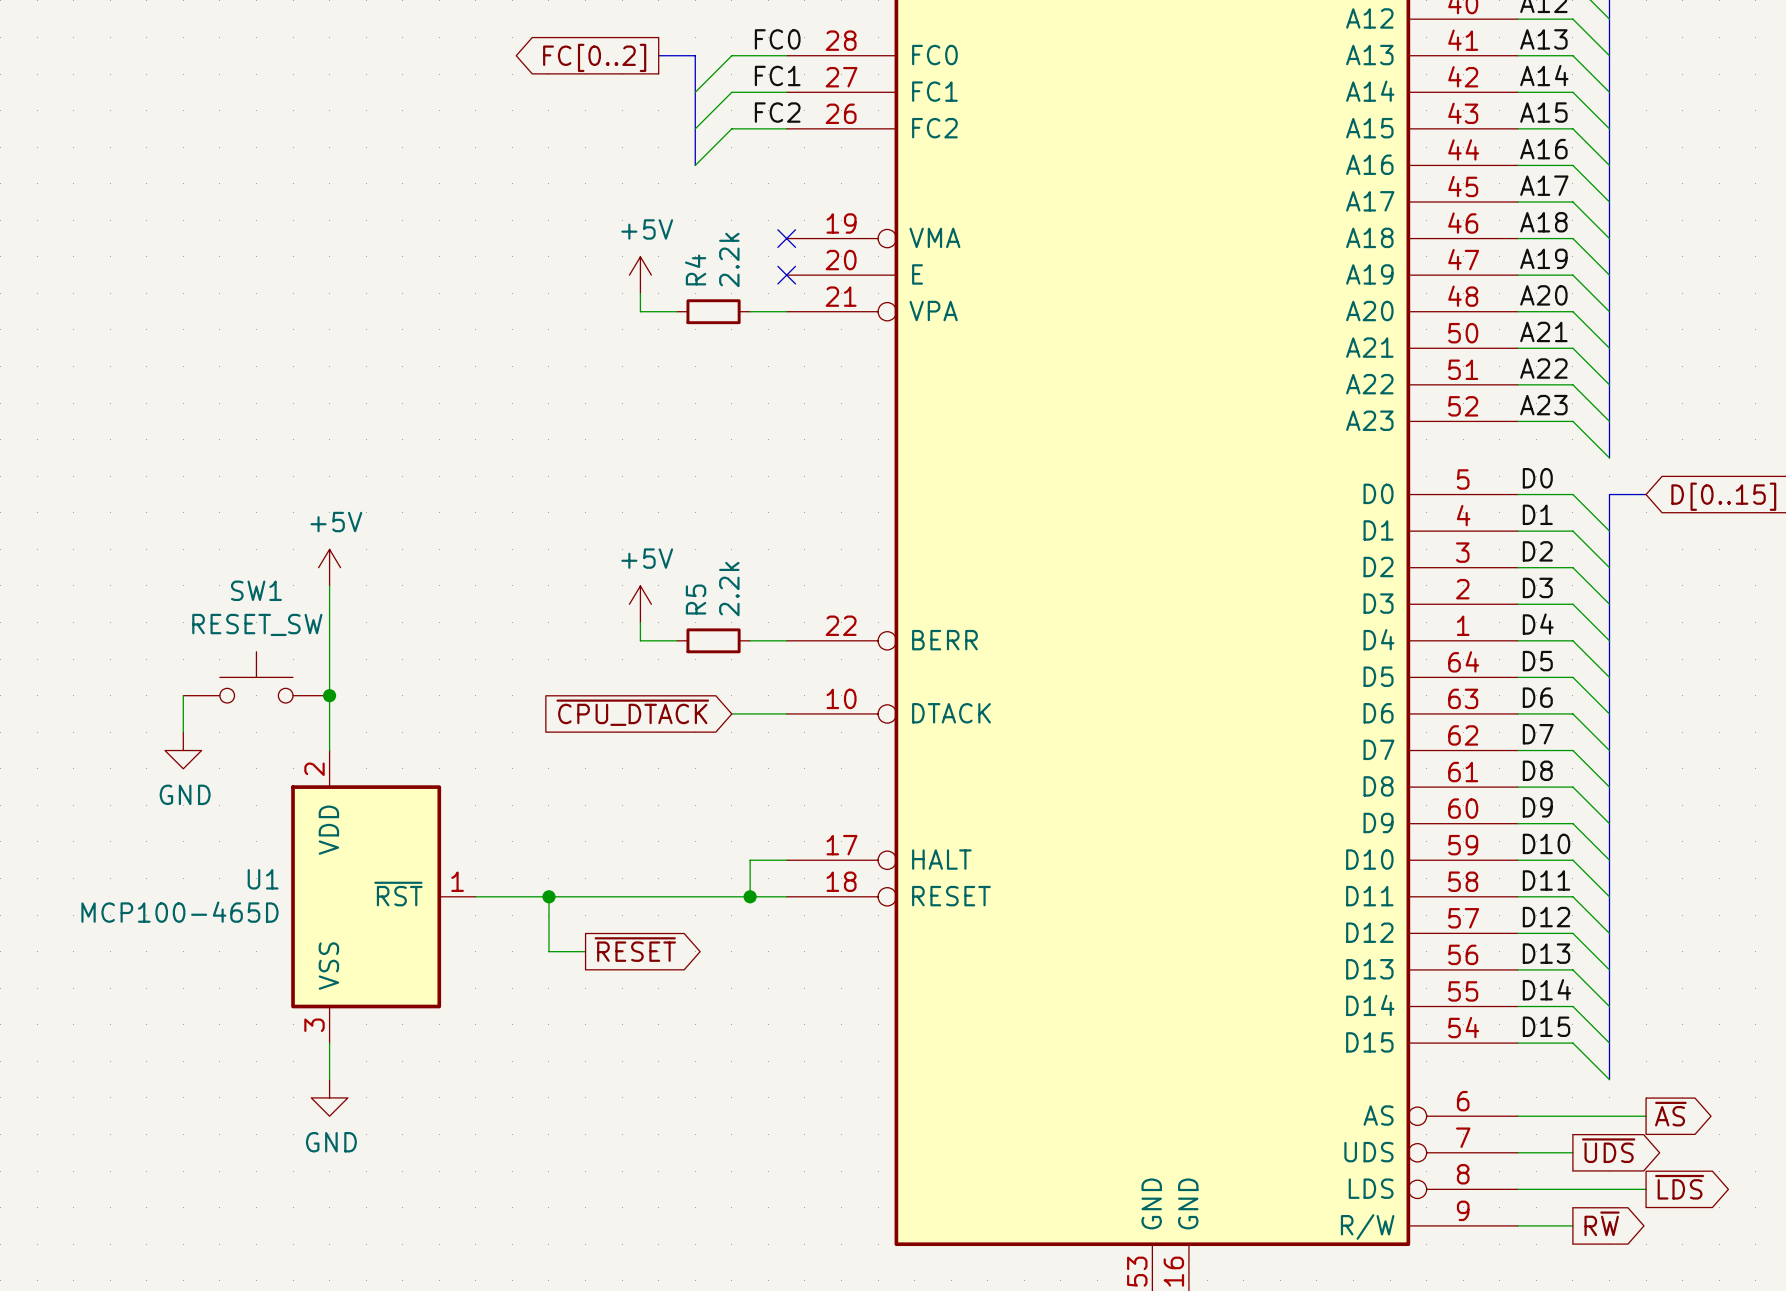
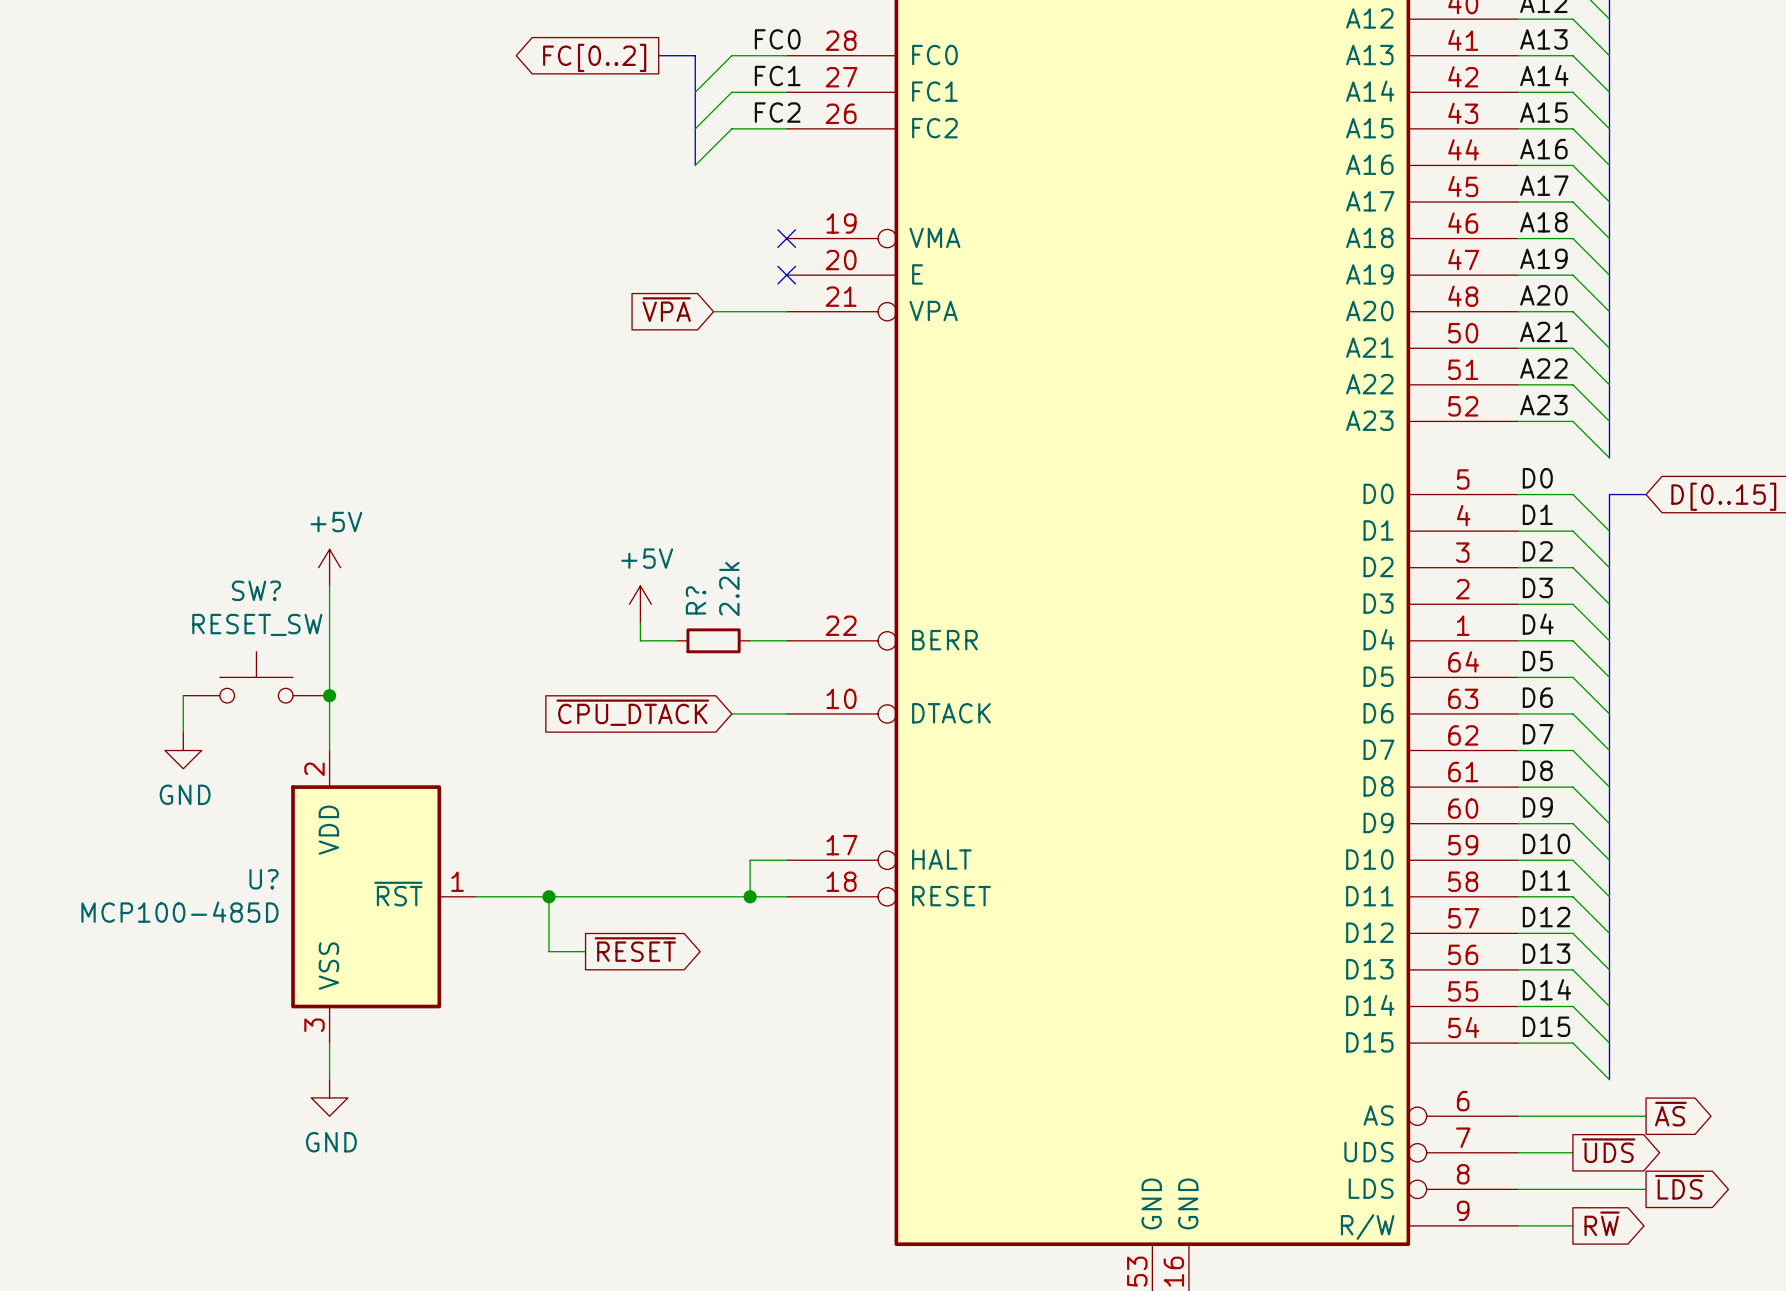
power symbol: +5V (640, 275) -> none
wire: (640, 293) (640, 311) (676, 311) -> none
global label: none -> ~{VPA} (666, 309)
wire: none -> (713, 311) (750, 311)
R4: 2.2k (713, 311) -> none
SW1 name: SW1 (256, 590) -> SW? (256, 590)
R5 name: R5 (696, 599) -> R? (696, 600)
U1 name: U1 (263, 879) -> U? (263, 879)
U1 value: MCP100-465D (179, 912) -> MCP100-485D (179, 912)

